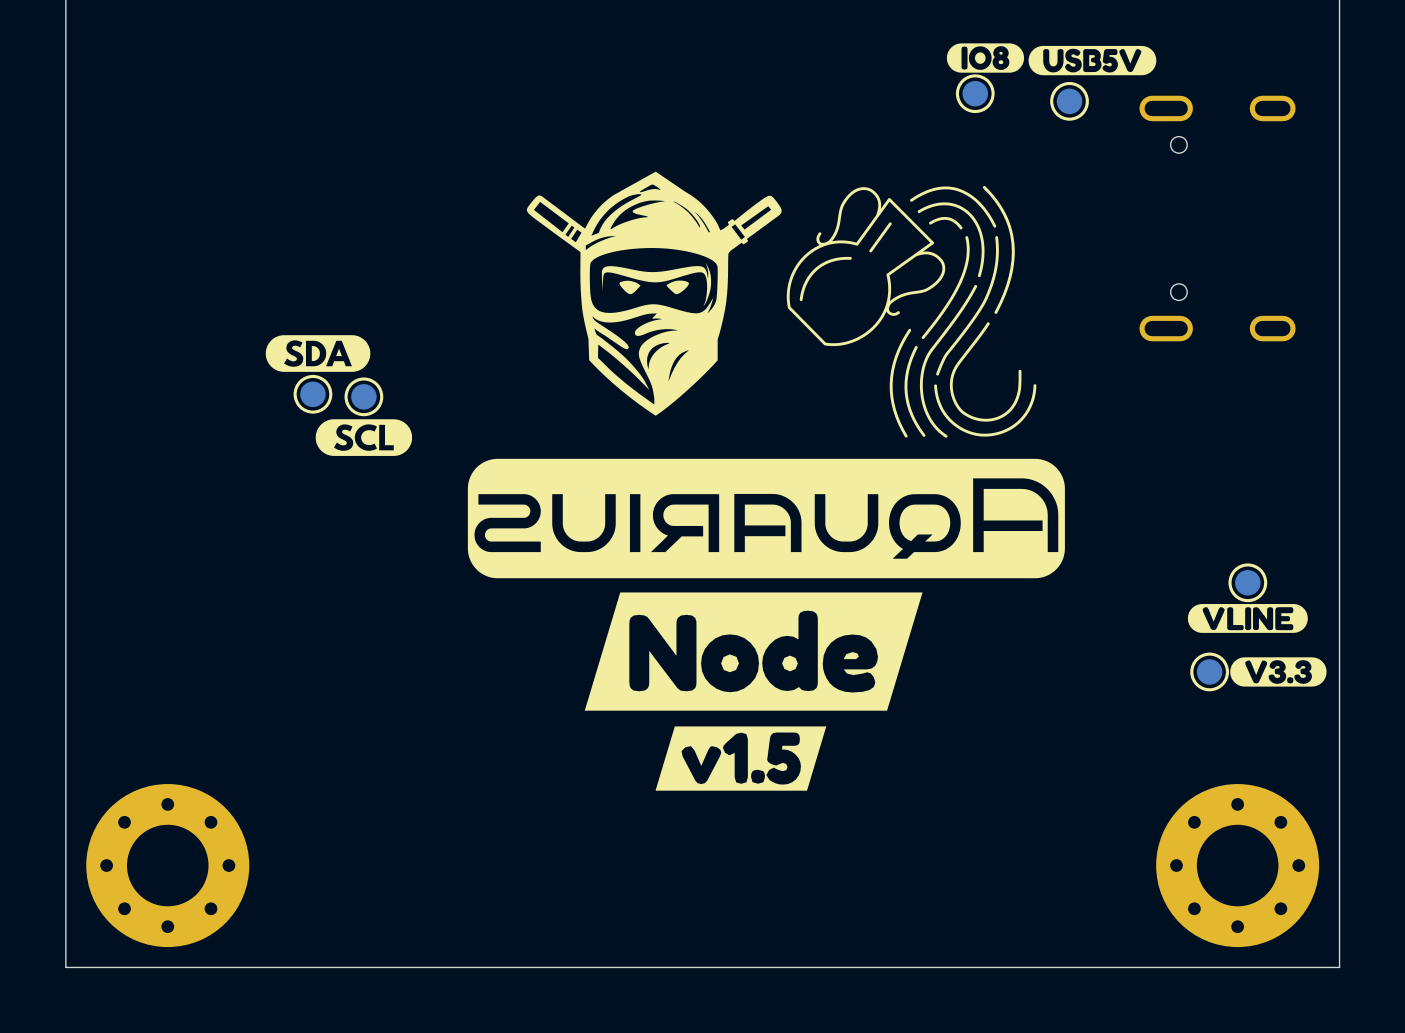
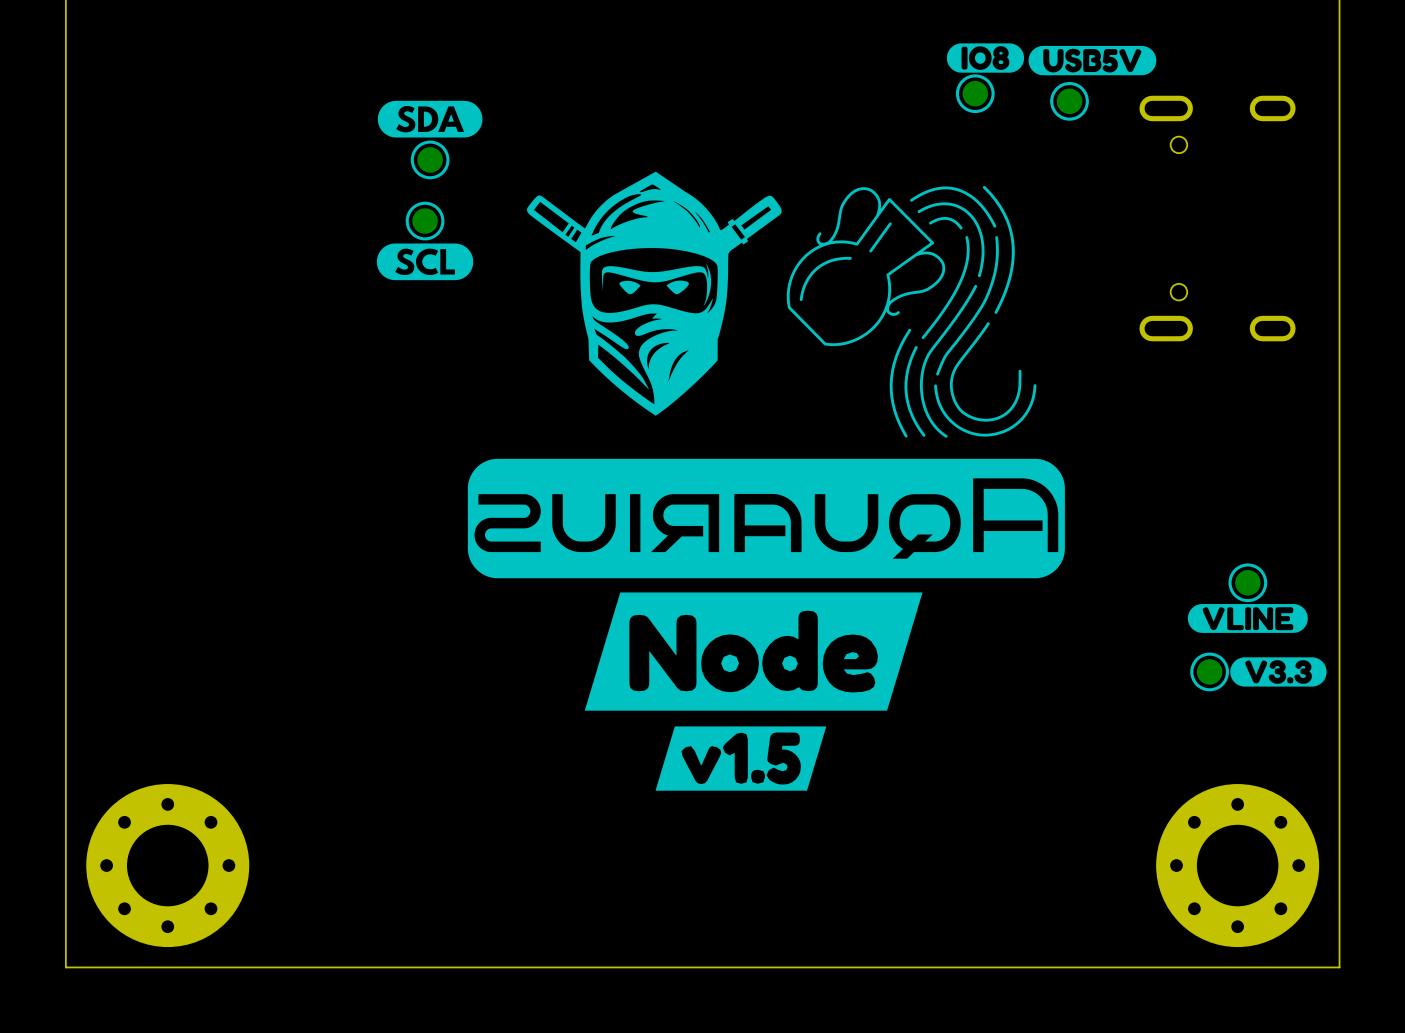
part: none -> (430, 159)
part: none -> (425, 221)
drawing position: (318, 353) -> (430, 119)
part: (312, 394) -> none
part: (363, 396) -> none
drawing position: (363, 437) -> (425, 261)

